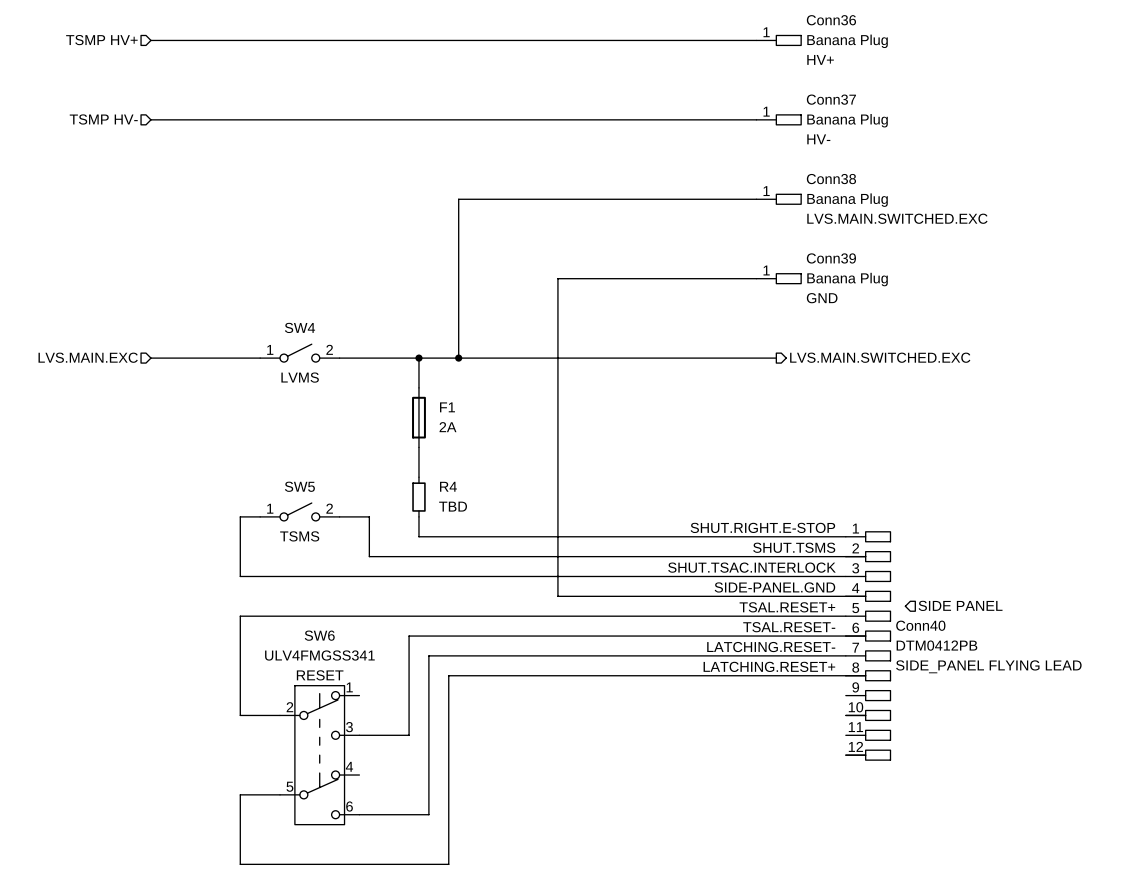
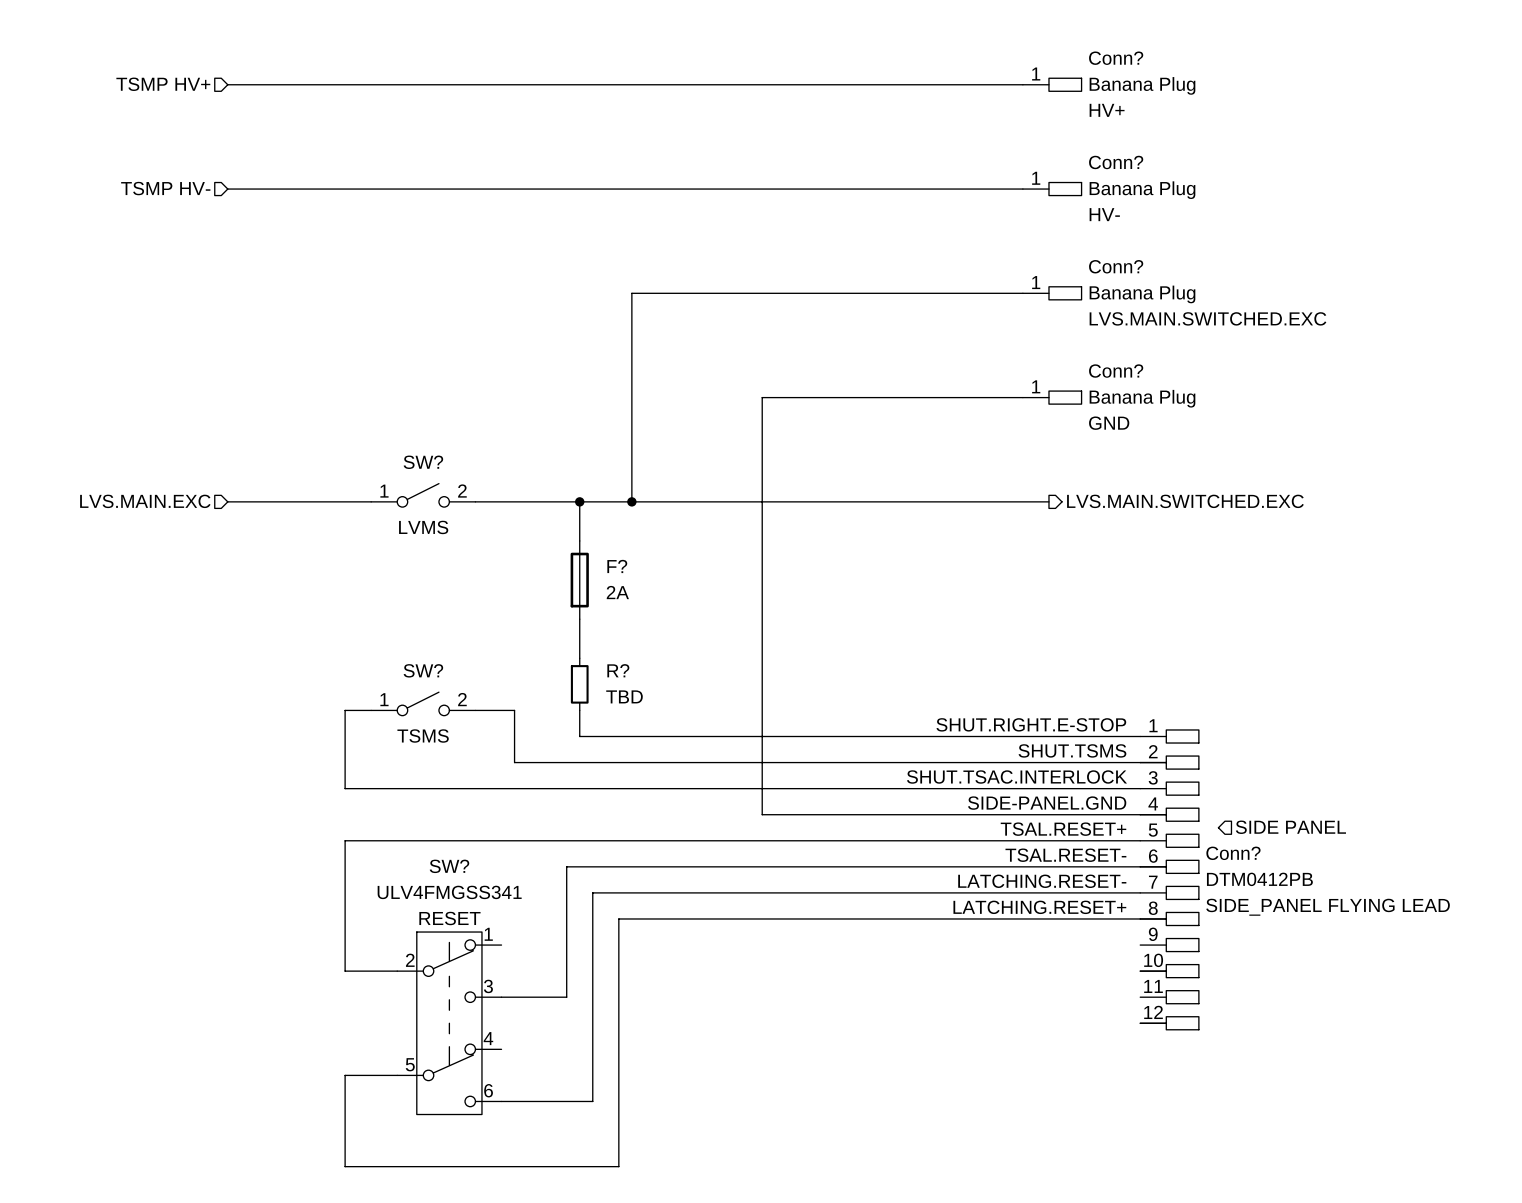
Conn36 name: Conn36 (831, 20) -> Conn? (1116, 58)
Conn37 name: Conn37 (831, 99) -> Conn? (1116, 162)
Conn38 name: Conn38 (831, 179) -> Conn? (1116, 266)
Conn39 name: Conn39 (831, 258) -> Conn? (1116, 371)
SW4 name: SW4 (299, 327) -> SW? (423, 462)
F1 name: F1 (447, 407) -> F? (617, 566)
SW5 name: SW5 (299, 486) -> SW? (423, 670)
R4 name: R4 (448, 486) -> R? (618, 670)
Conn40 name: Conn40 (920, 625) -> Conn? (1233, 853)
SW6 name: SW6 (319, 635) -> SW? (449, 866)

